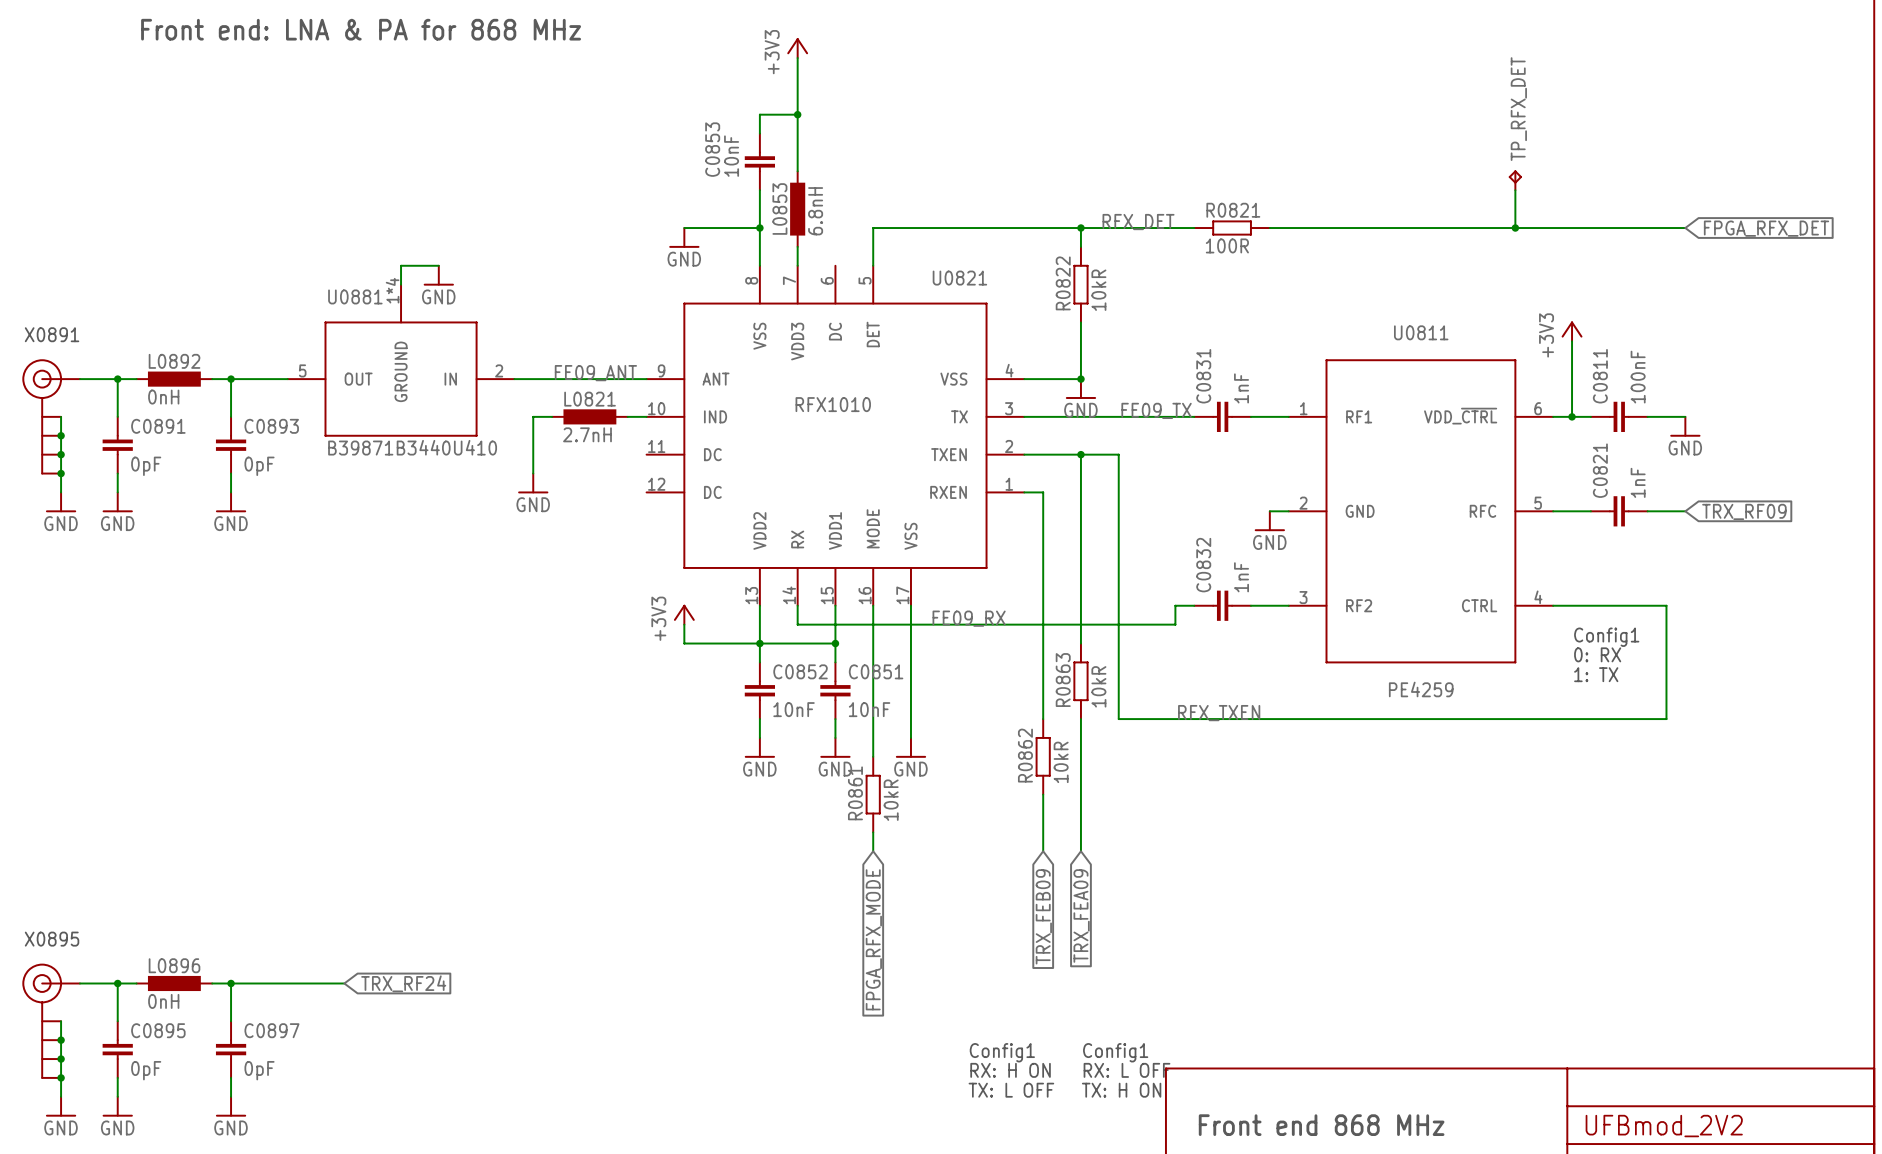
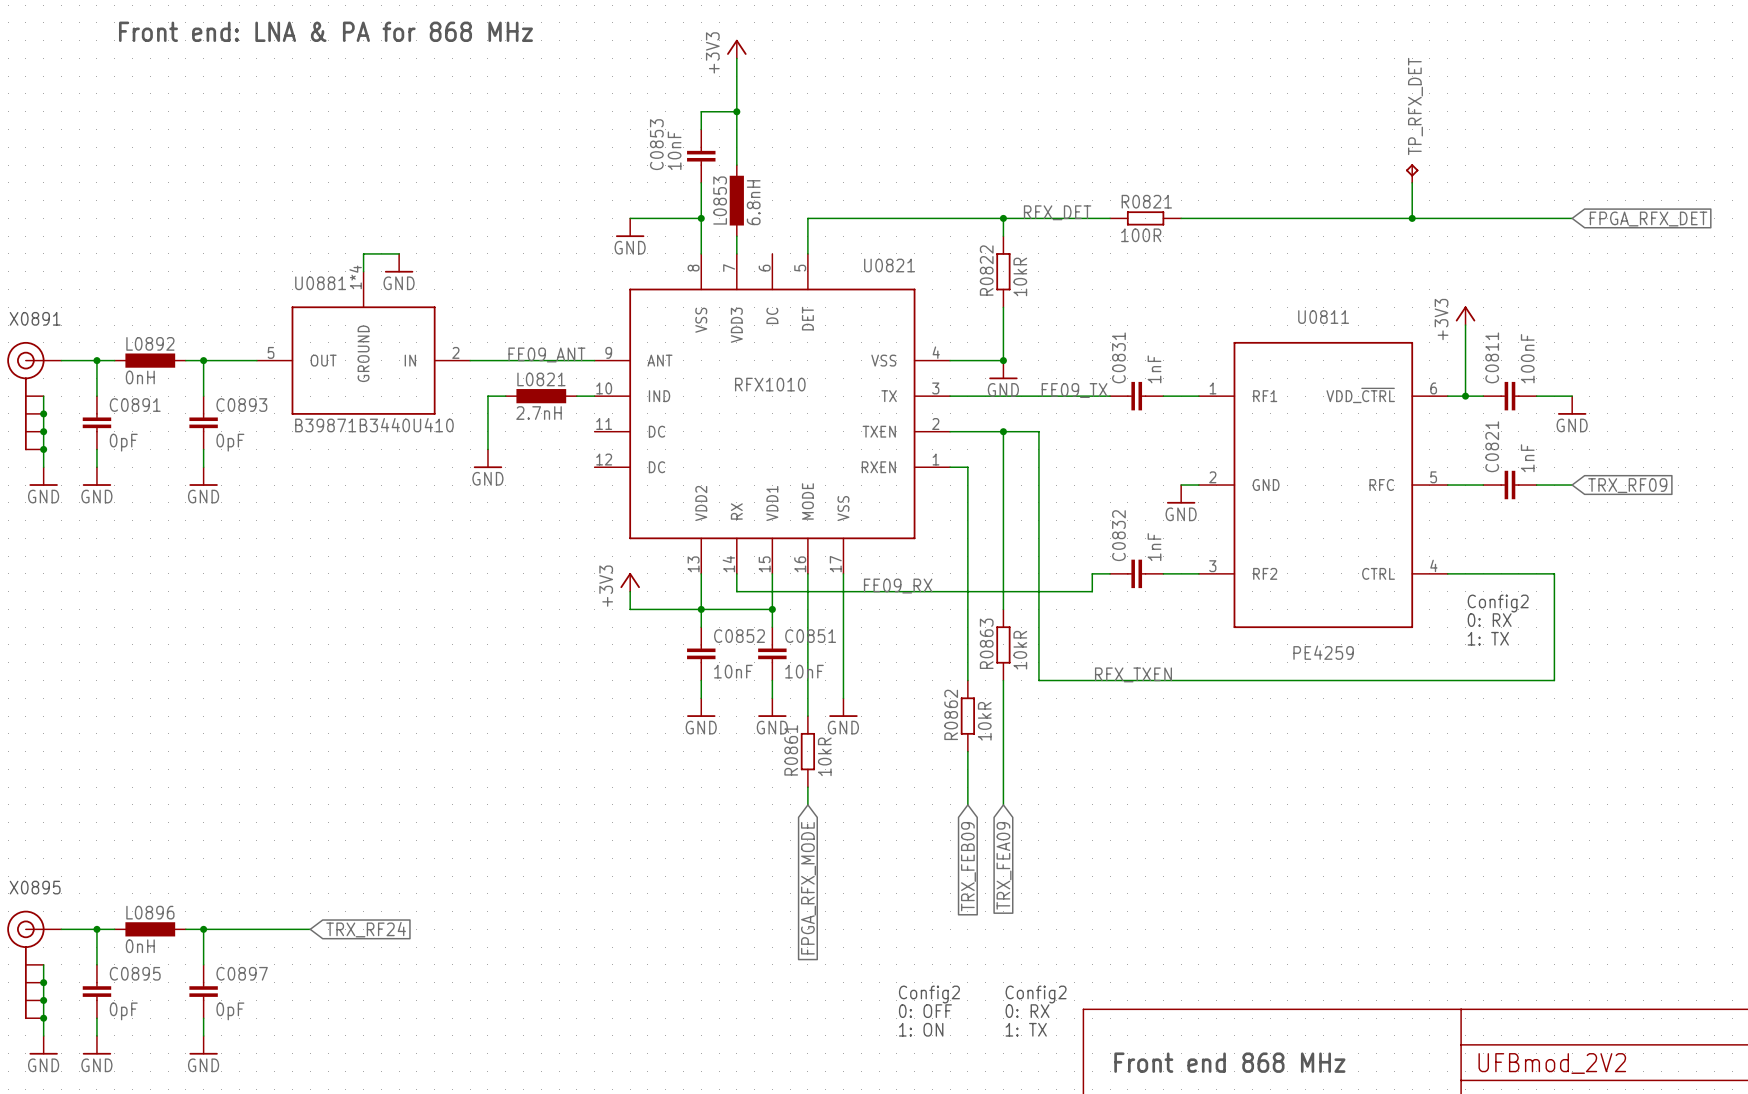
text: Config1 (1606, 637) -> Config2 (1498, 603)
text: Config1 (1002, 1052) -> Config2 (929, 994)
text: Config1 (1115, 1052) -> Config2 (1036, 994)
text: RX: H ON (1010, 1070) -> 0: OFF (925, 1011)
text: RX: L OFF (1126, 1070) -> 0: RX (1027, 1011)
text: TX: L OFF (1011, 1090) -> 1: ON (921, 1029)
text: TX: H ON (1121, 1090) -> 1: TX (1026, 1029)

